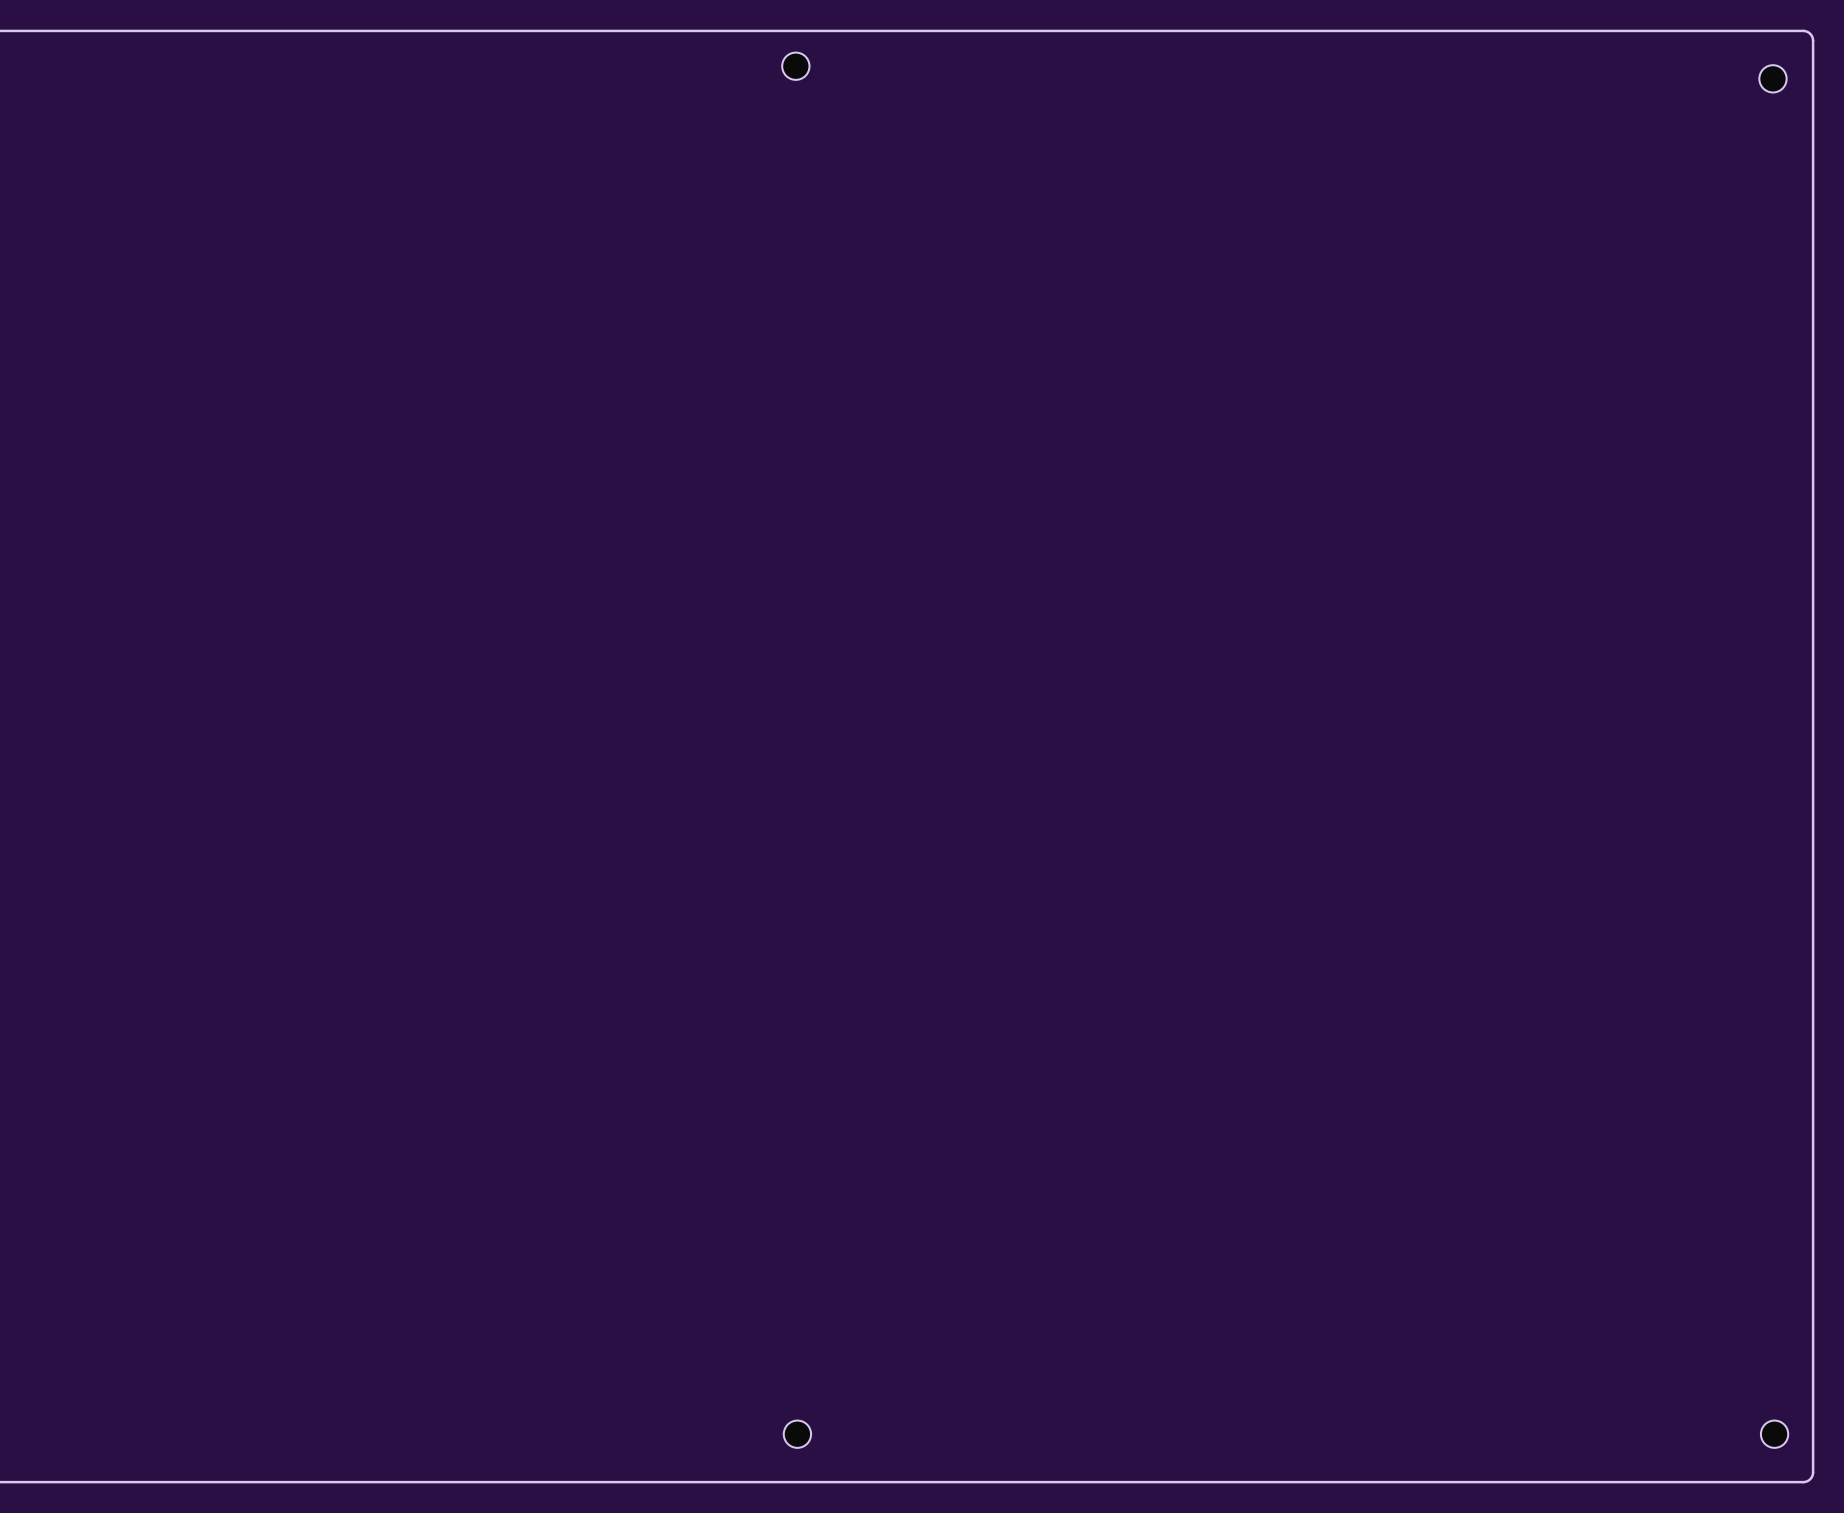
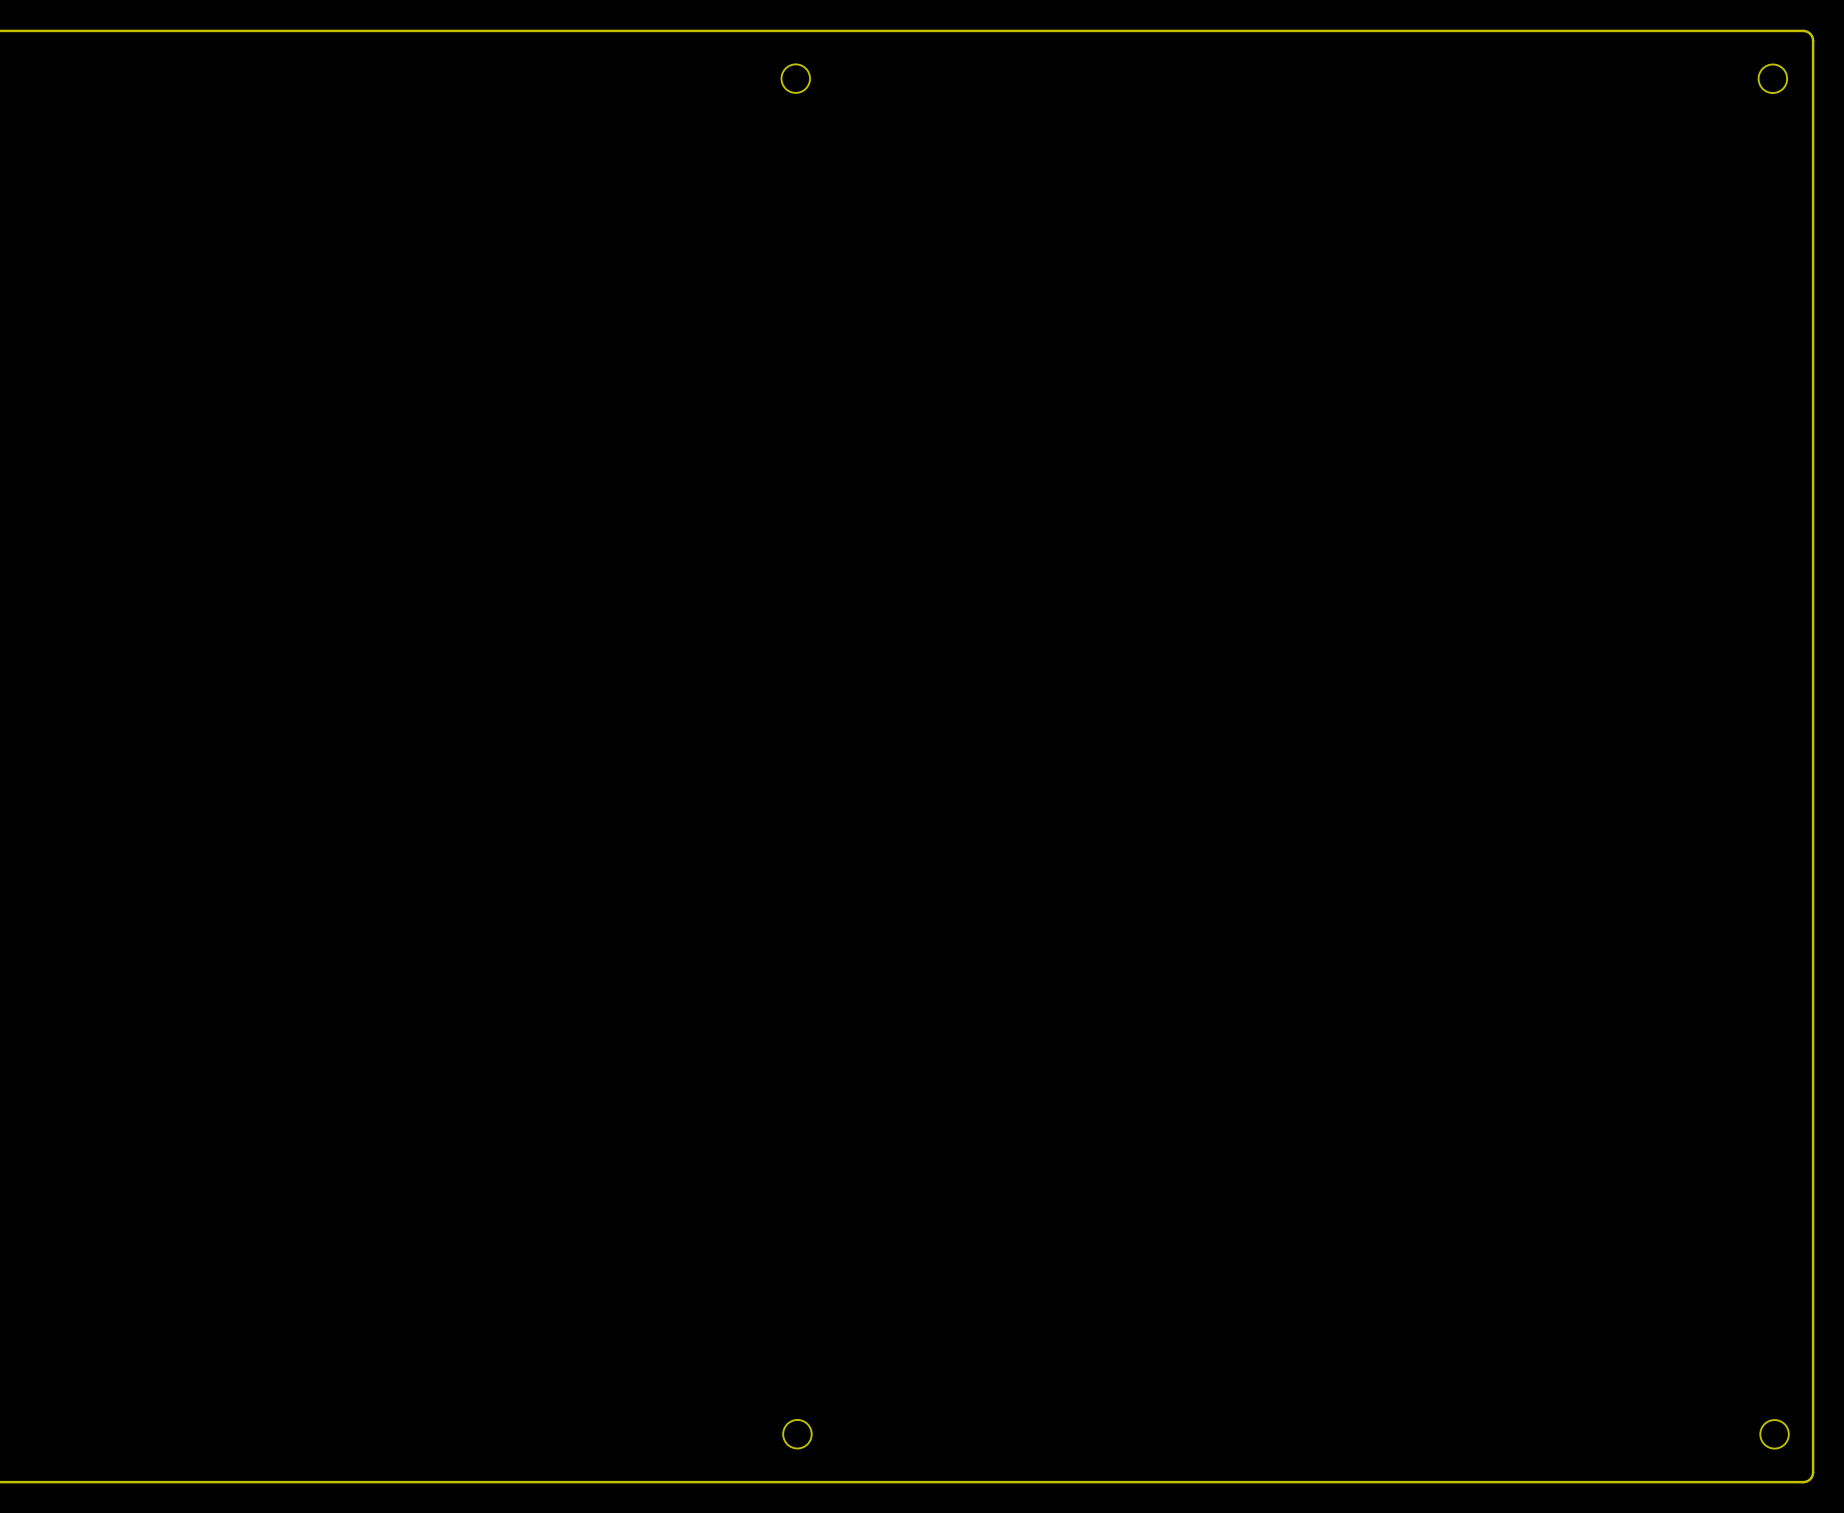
round board edge: none -> [780, 63, 811, 94]
round board edge: none -> [1757, 63, 1789, 94]
part: (795, 66) -> none
part: (1772, 78) -> none
round board edge: none -> [782, 1419, 813, 1450]
round board edge: none -> [1759, 1419, 1790, 1450]
part: (797, 1434) -> none
part: (1774, 1434) -> none

